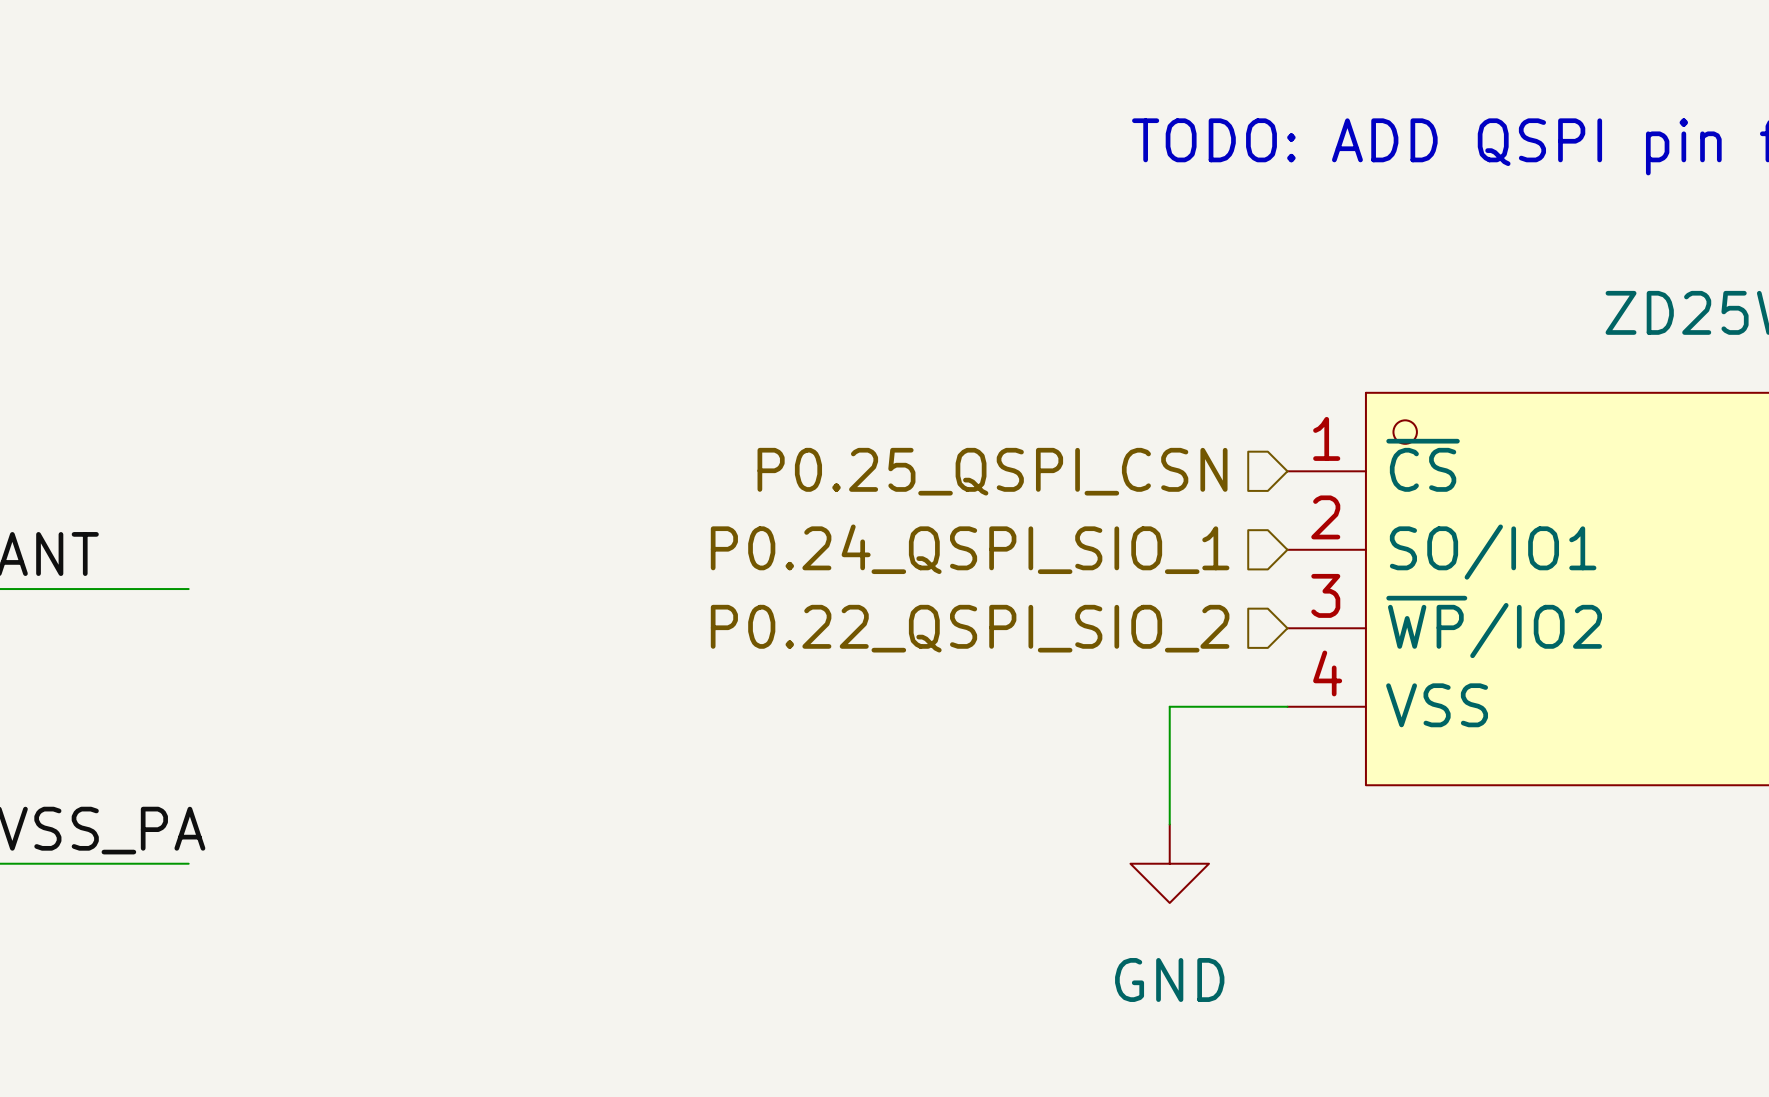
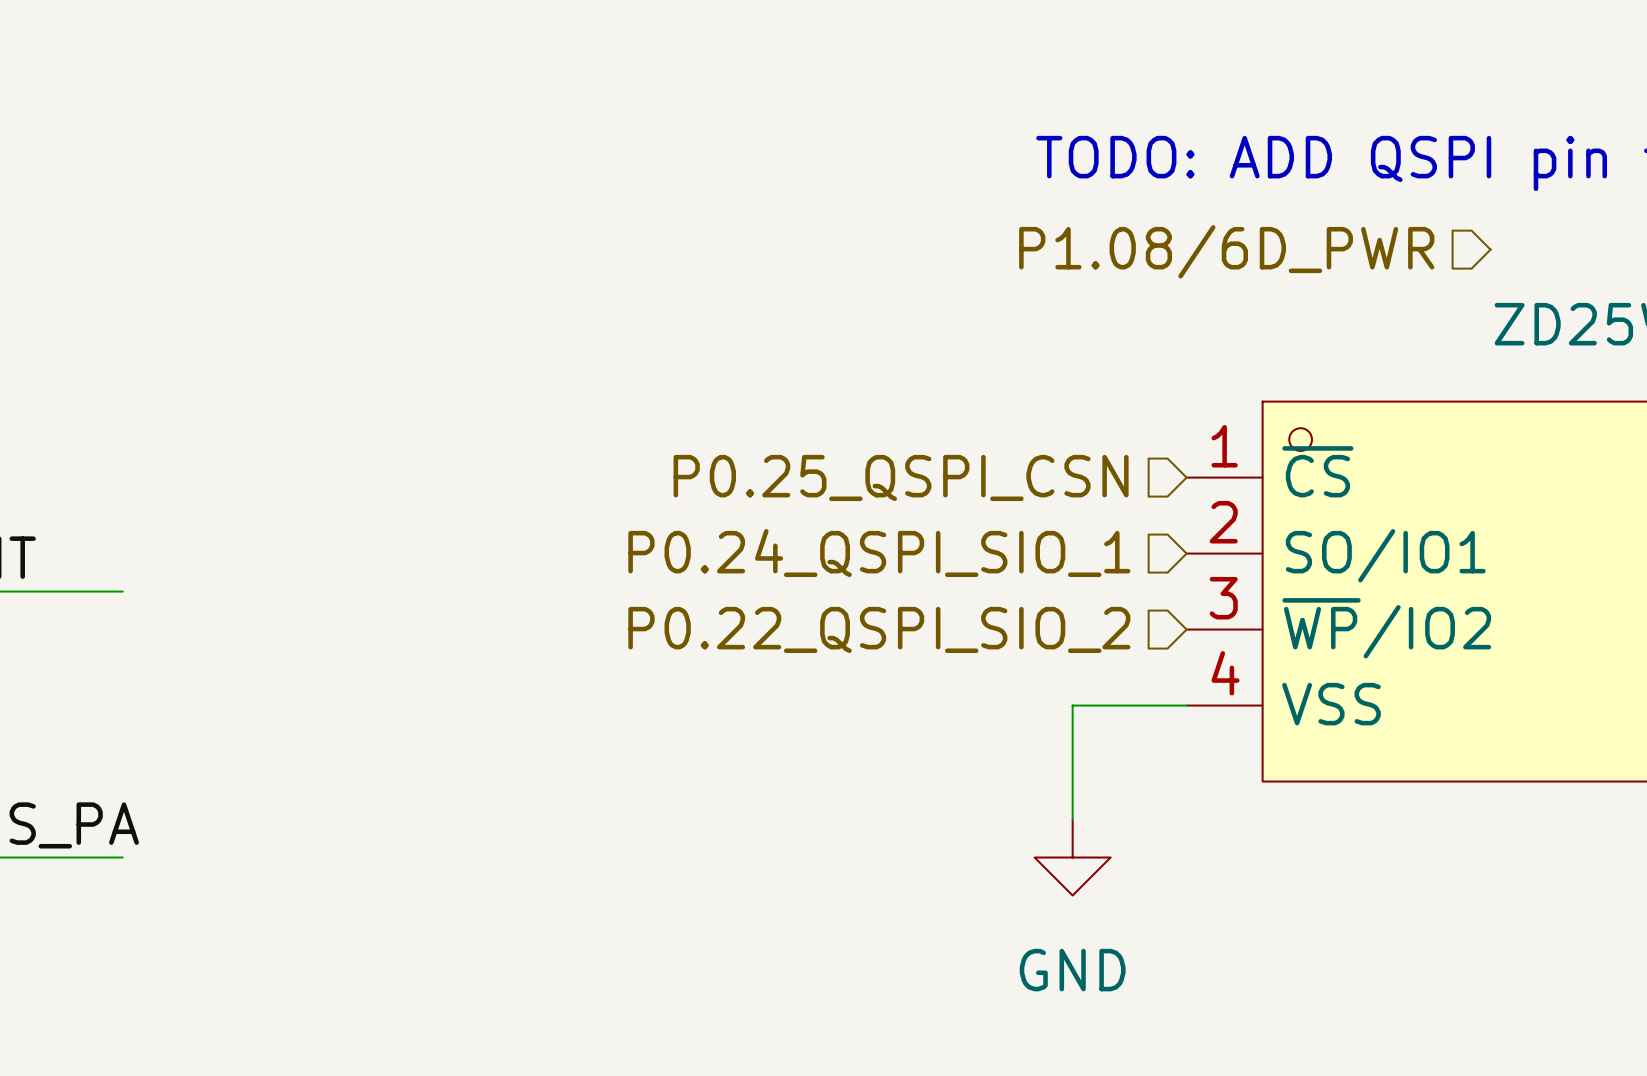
hierarchical label: none -> P1.08/6D_PWR (1226, 251)

